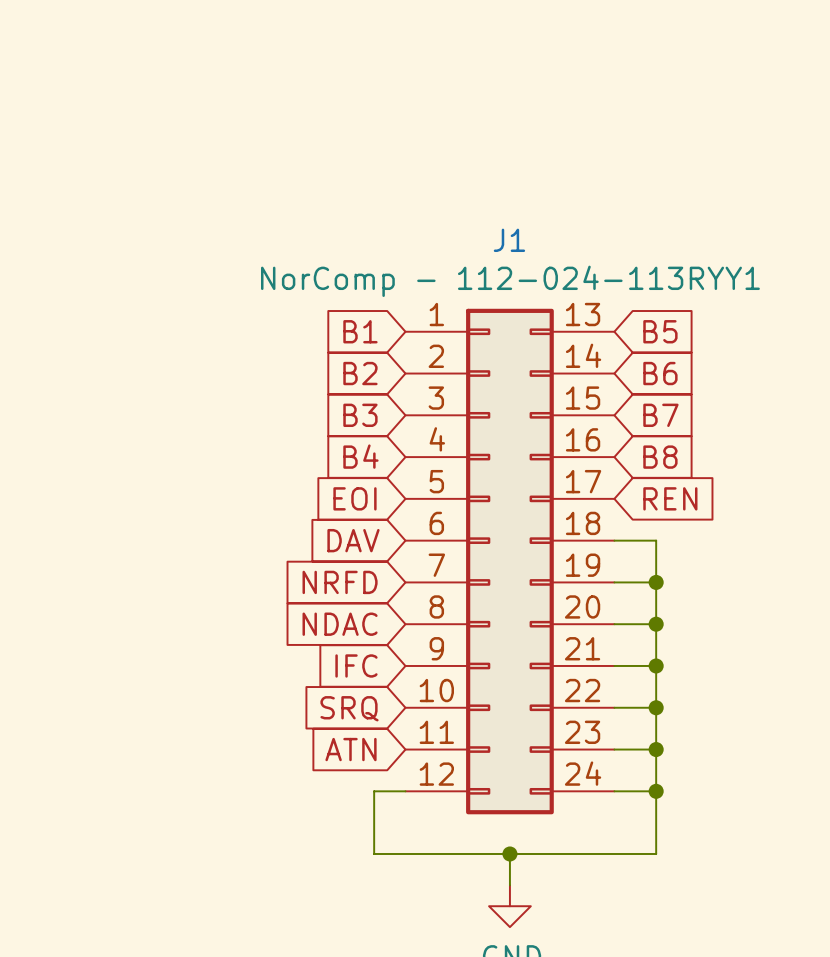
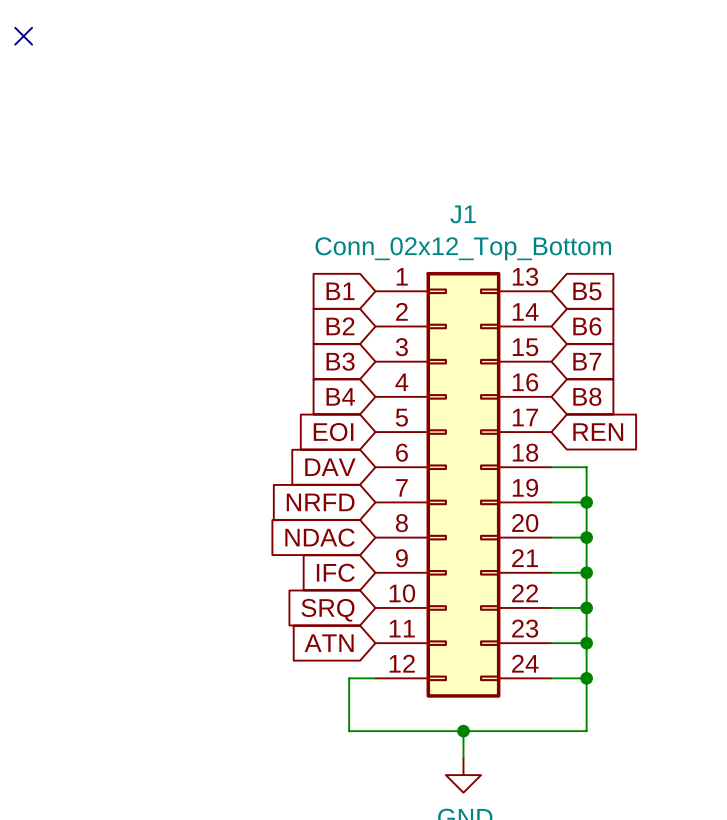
J1 value: NorComp - 112-024-113RYY1 (510, 281) -> Conn_02x12_Top_Bottom (463, 248)

